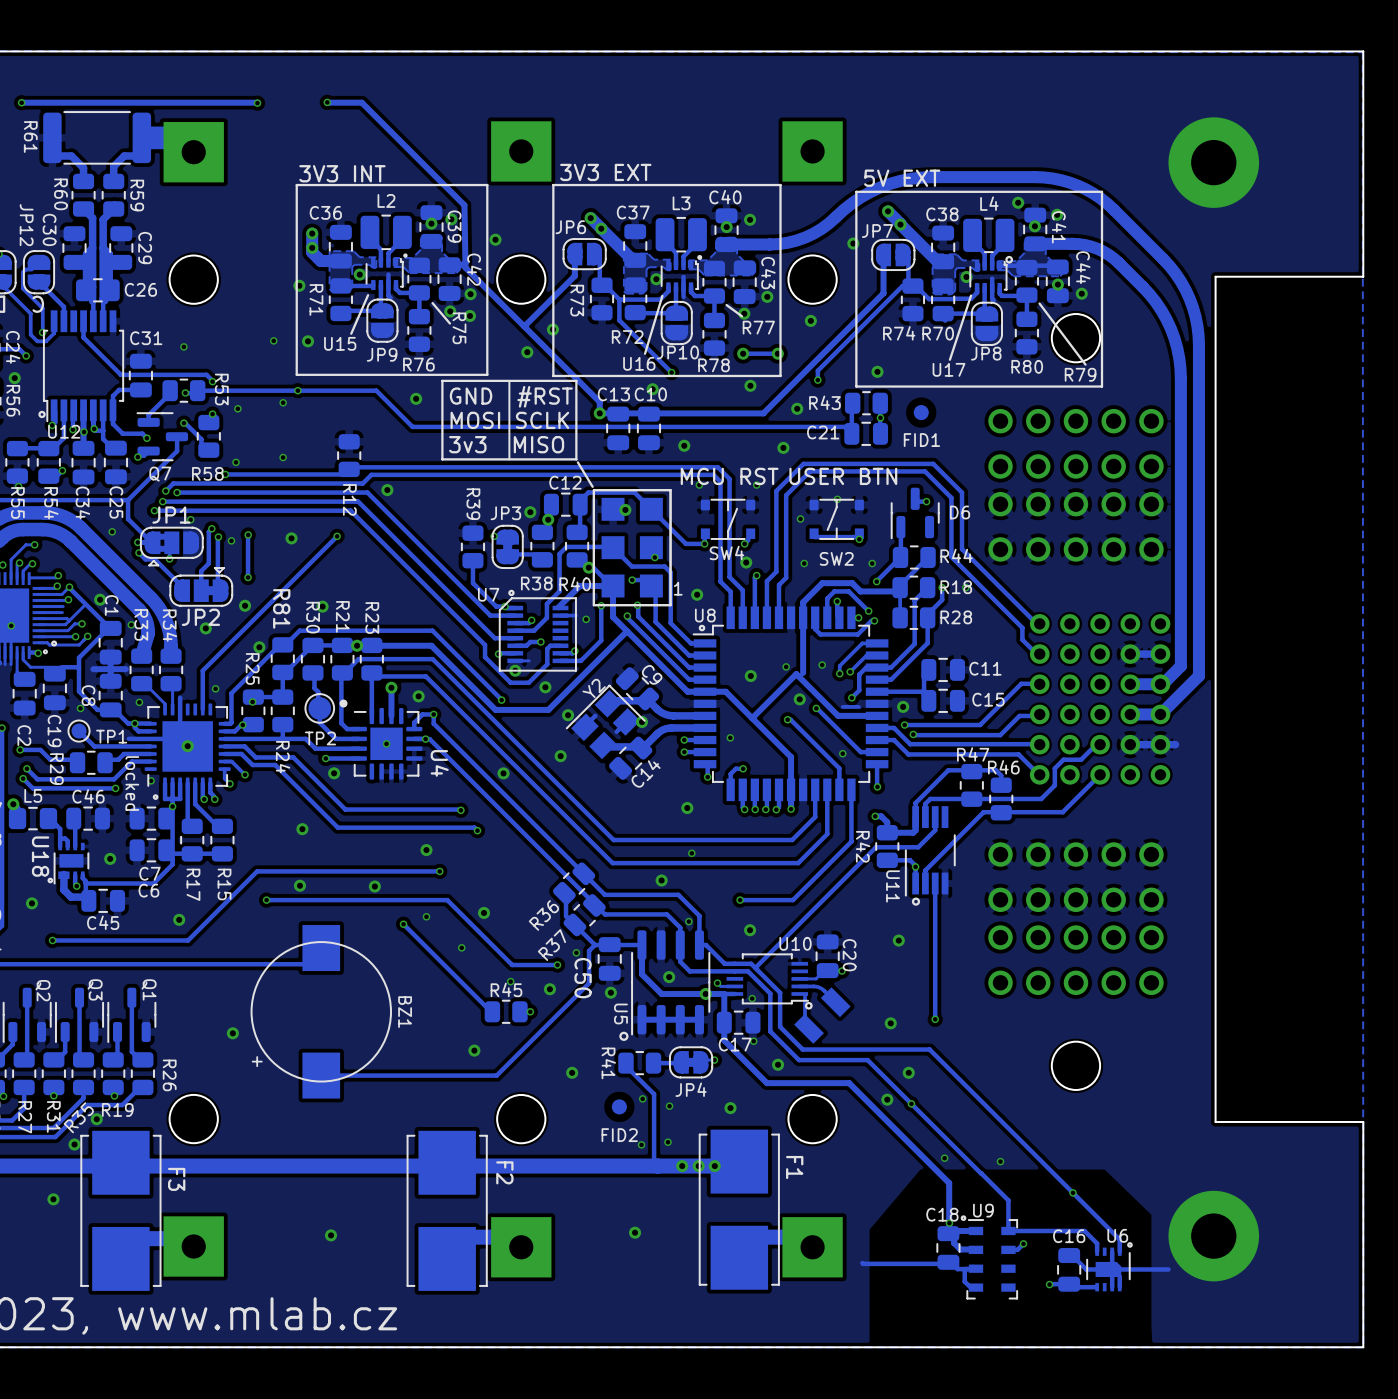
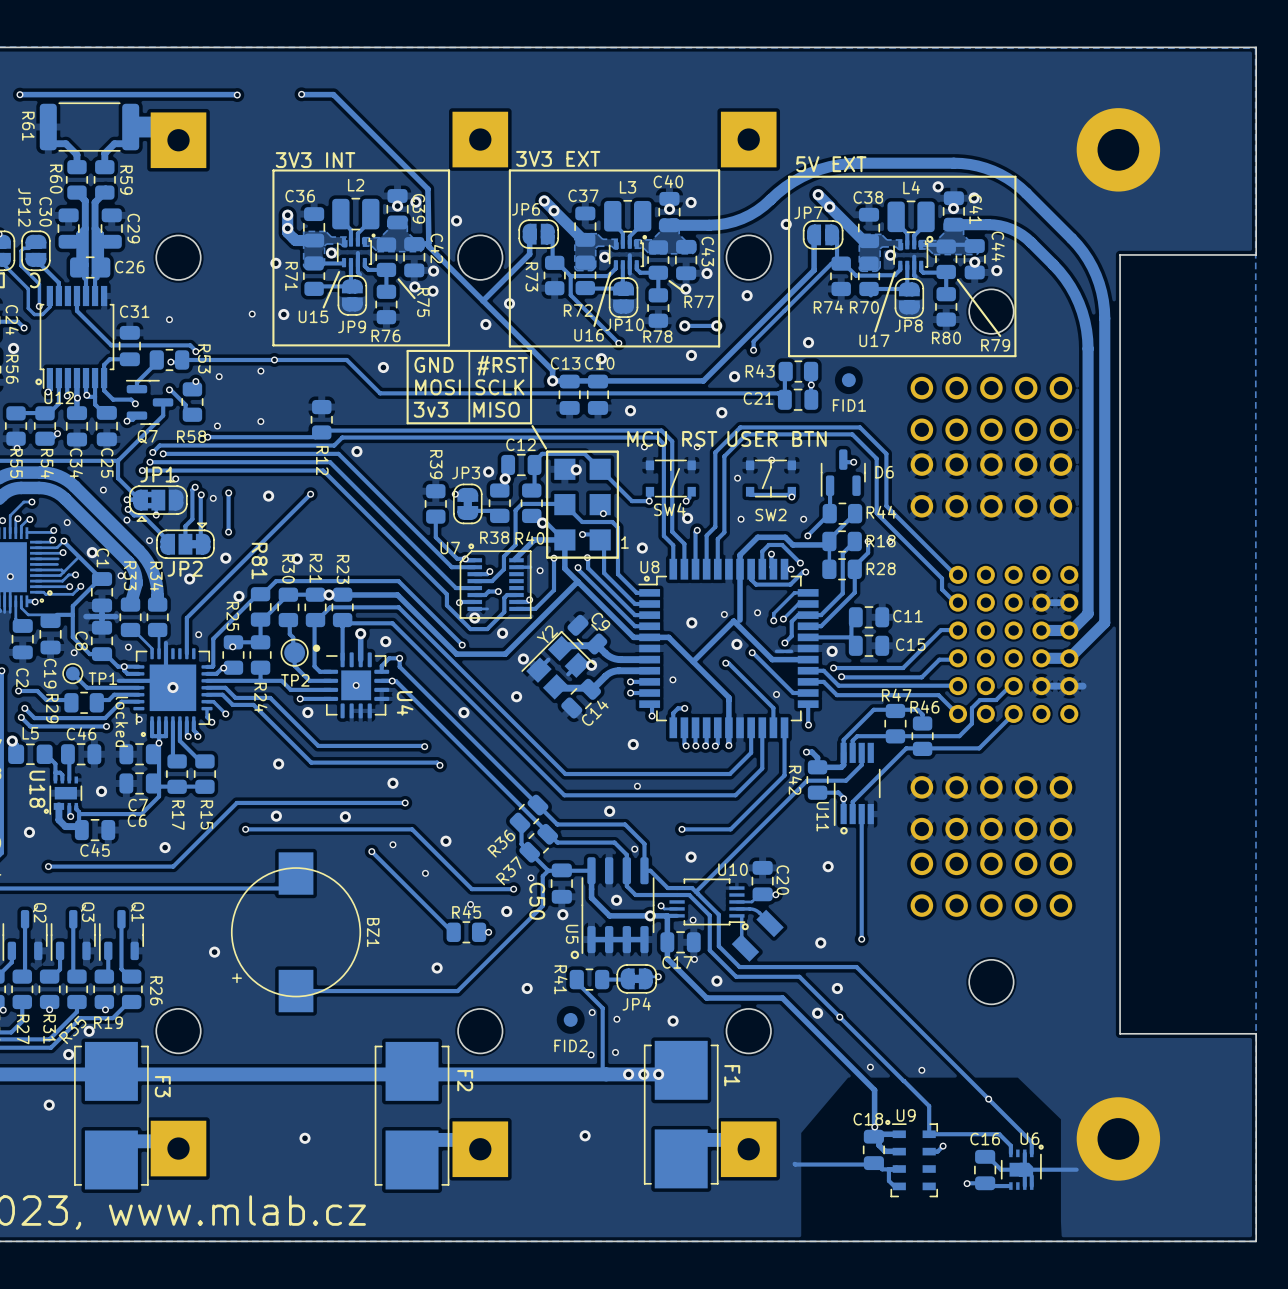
via: none -> (126, 520)
via: none -> (67, 522)
via: none -> (149, 540)

